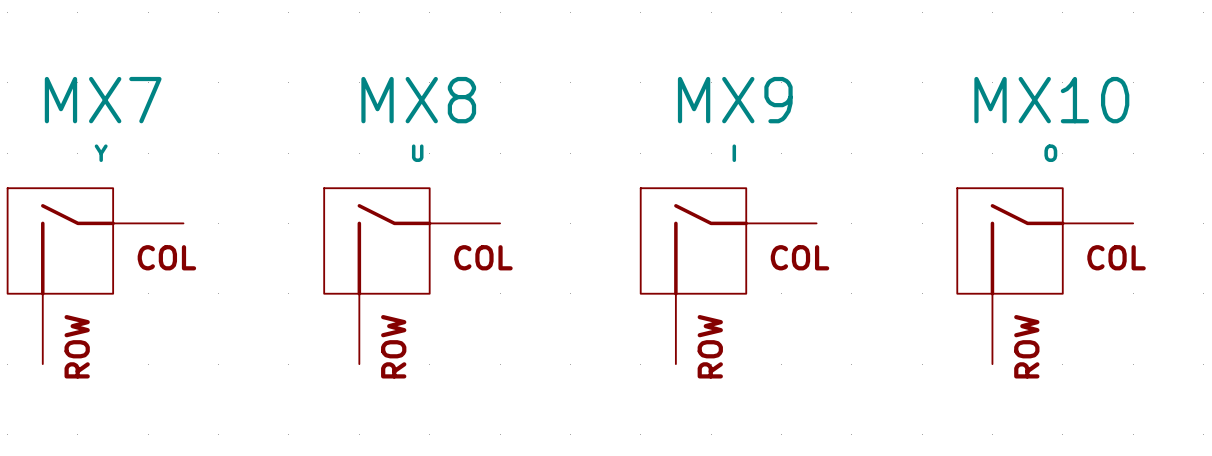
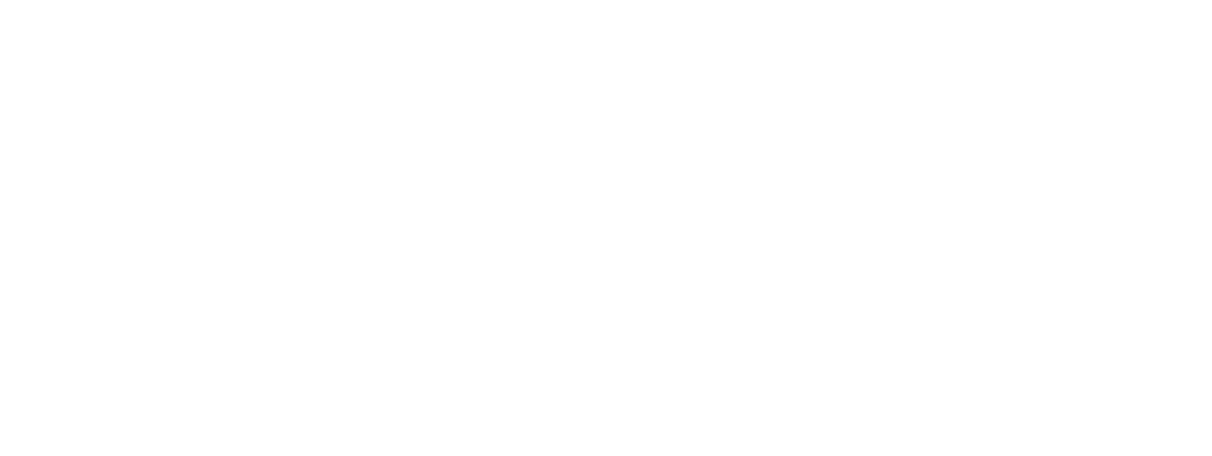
MX7: Y (95, 276) -> none
MX8: U (412, 276) -> none
MX9: I (728, 276) -> none
MX10: O (1045, 276) -> none

